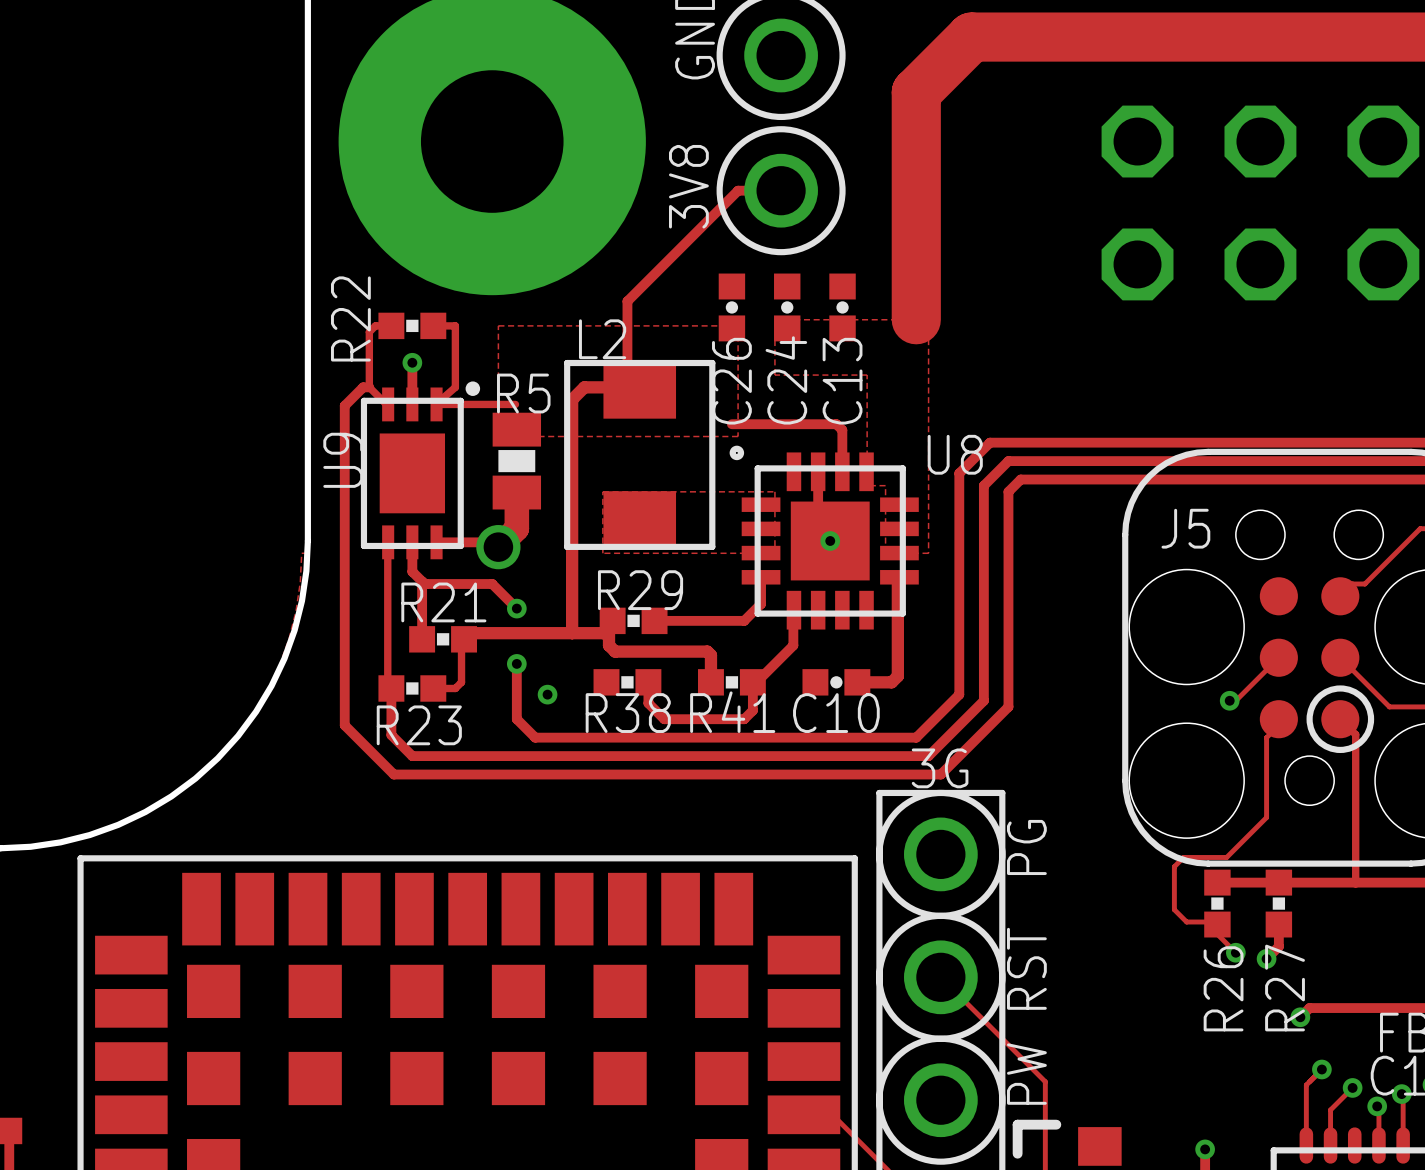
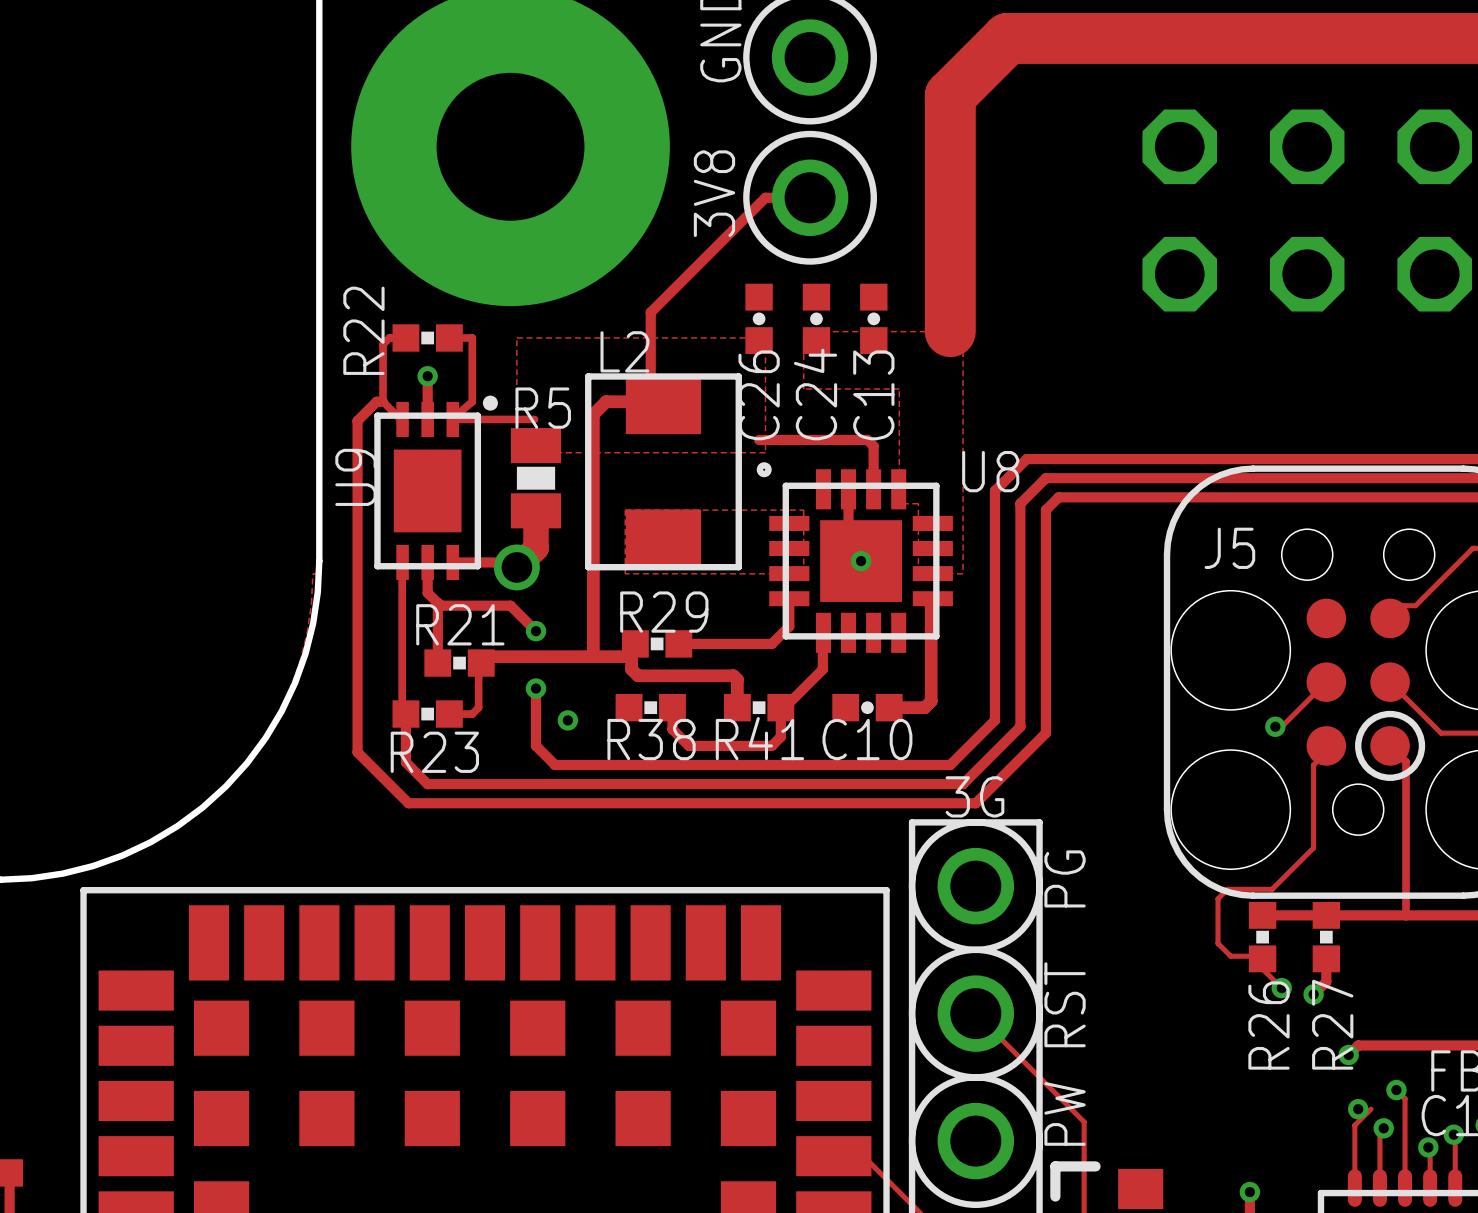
track: none -> (1396, 1090) (1405, 1098) (1405, 1188)
via: none -> (1396, 1090)
via: none -> (1358, 1109)
via: (1321, 1069) -> none
via: none -> (1383, 1128)
track: (1352, 1087) (1330, 1110) -> (1383, 1128) (1379, 1132) (1379, 1151)
via: (1352, 1087) -> none

